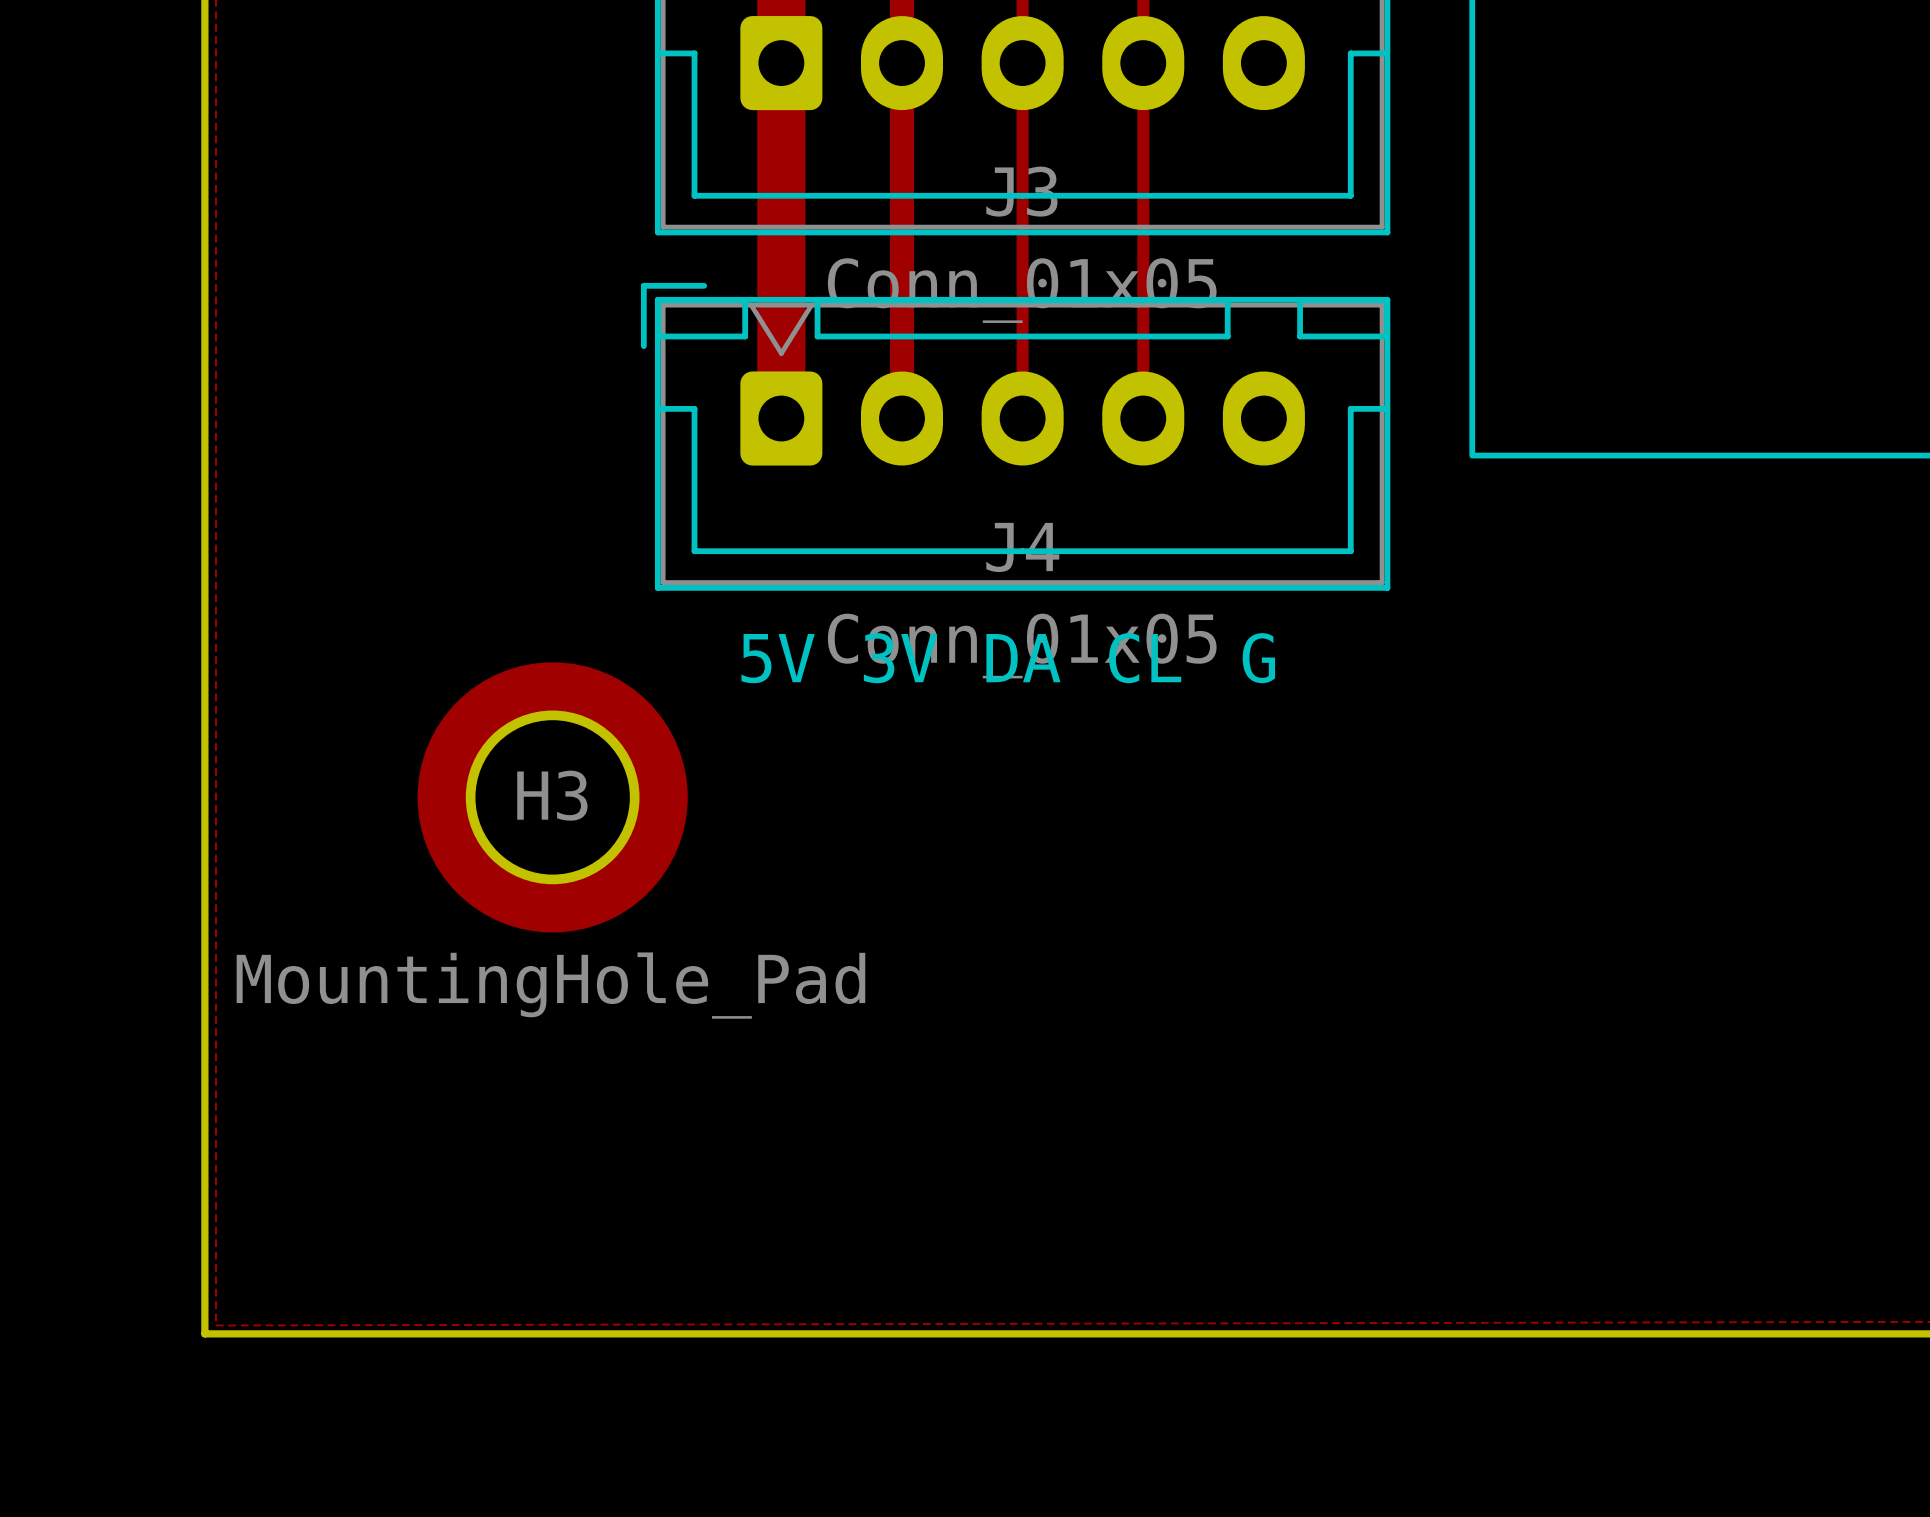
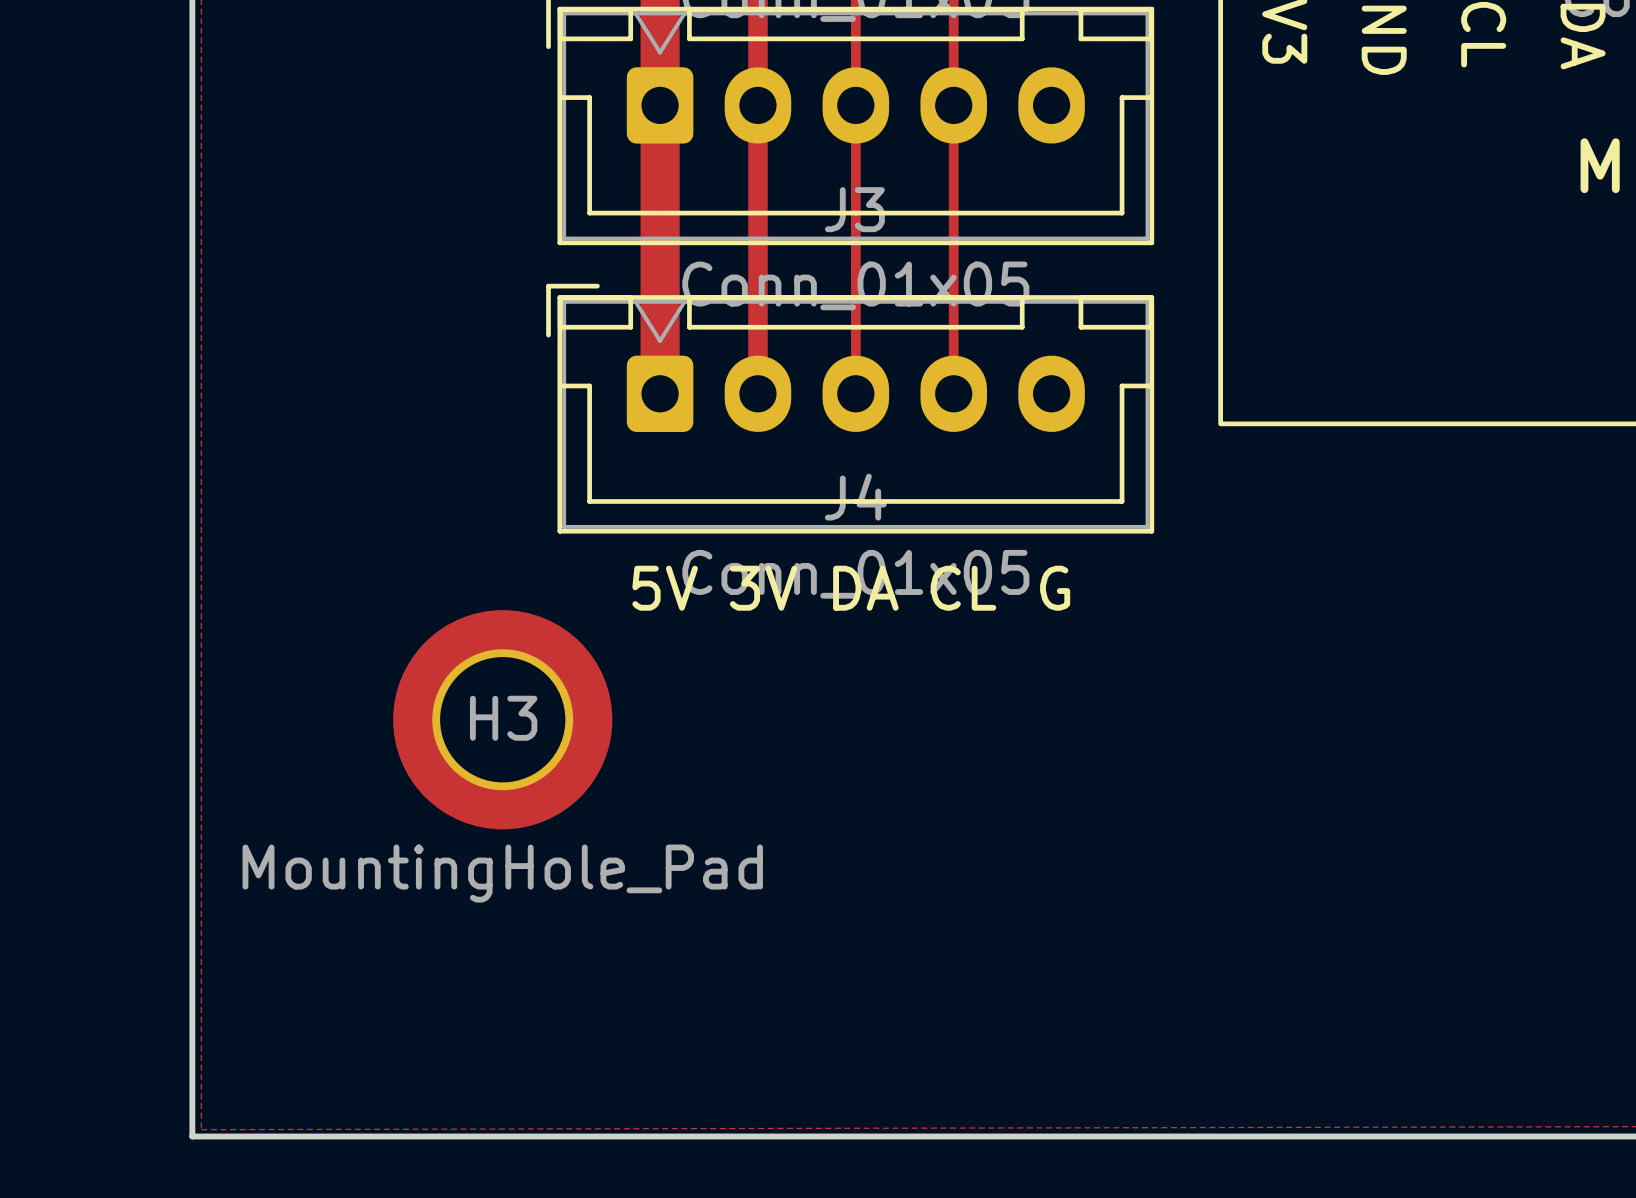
H3 position: (552, 797) -> (502, 719)

